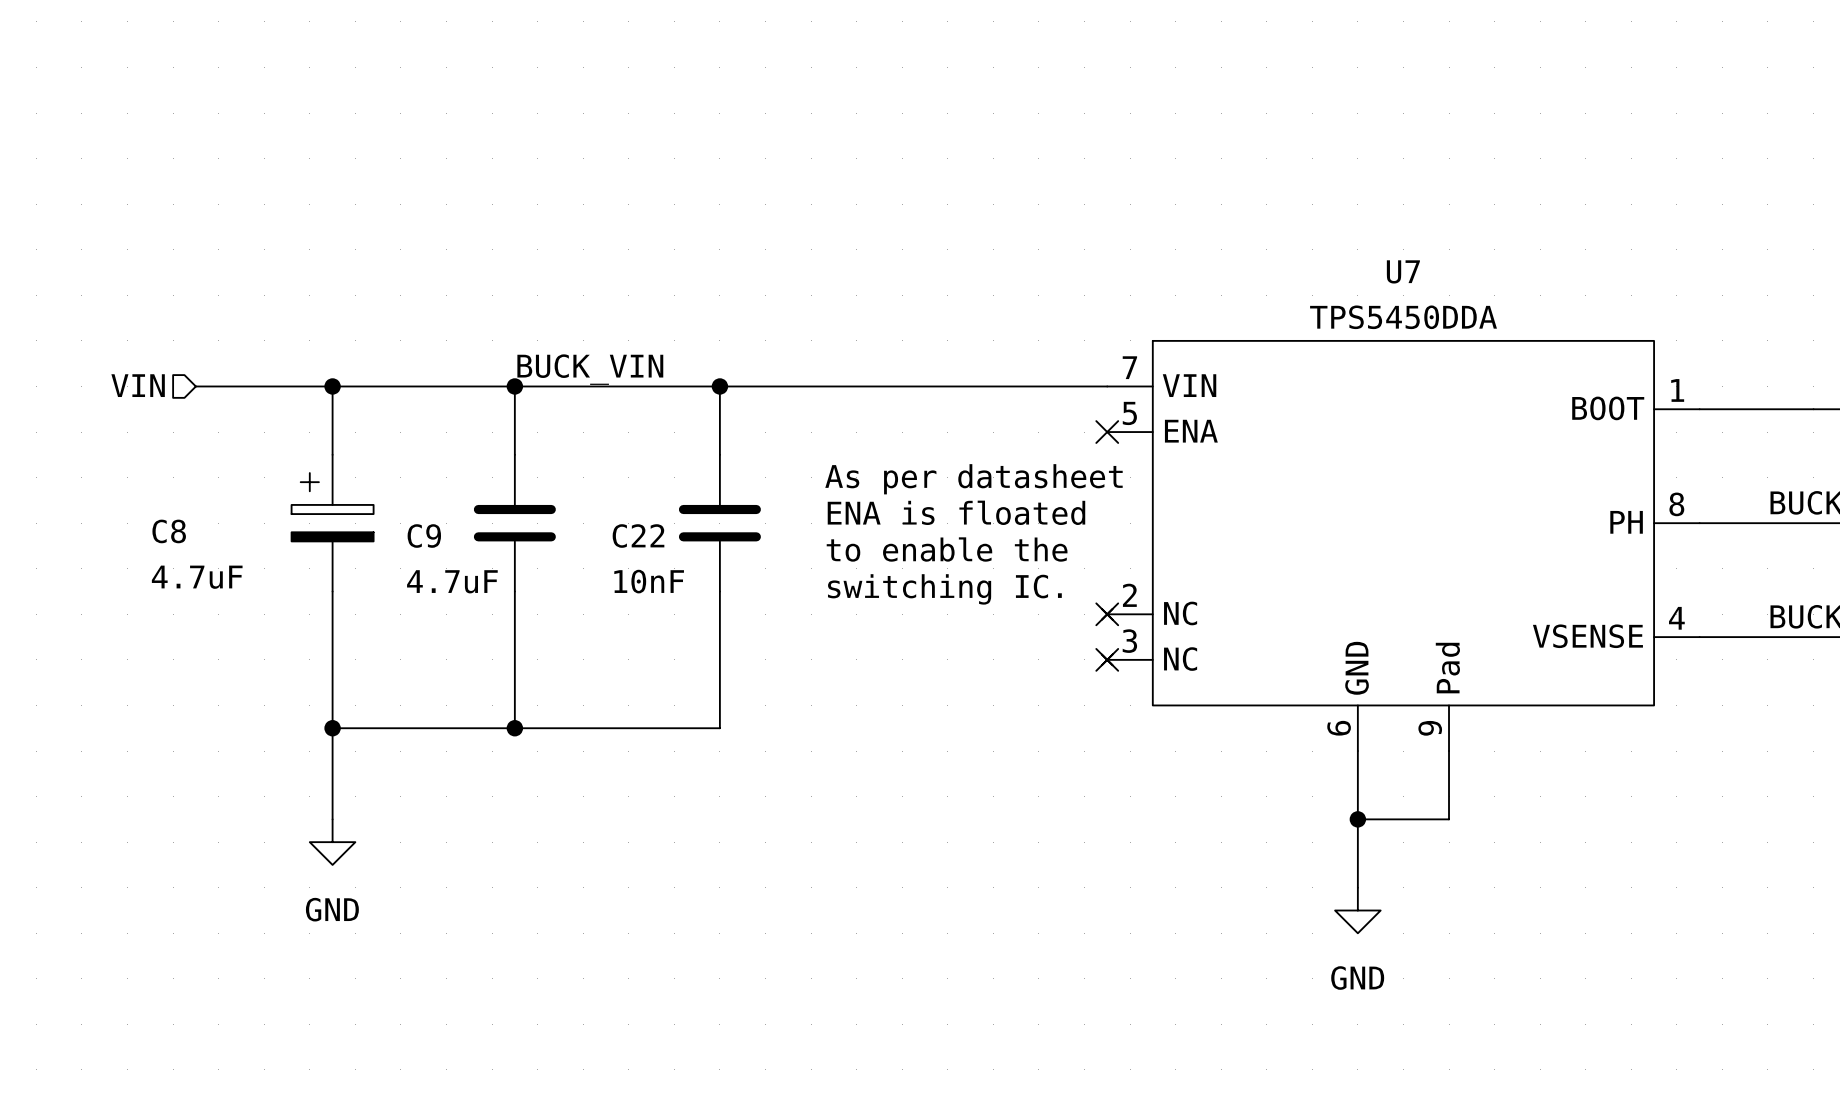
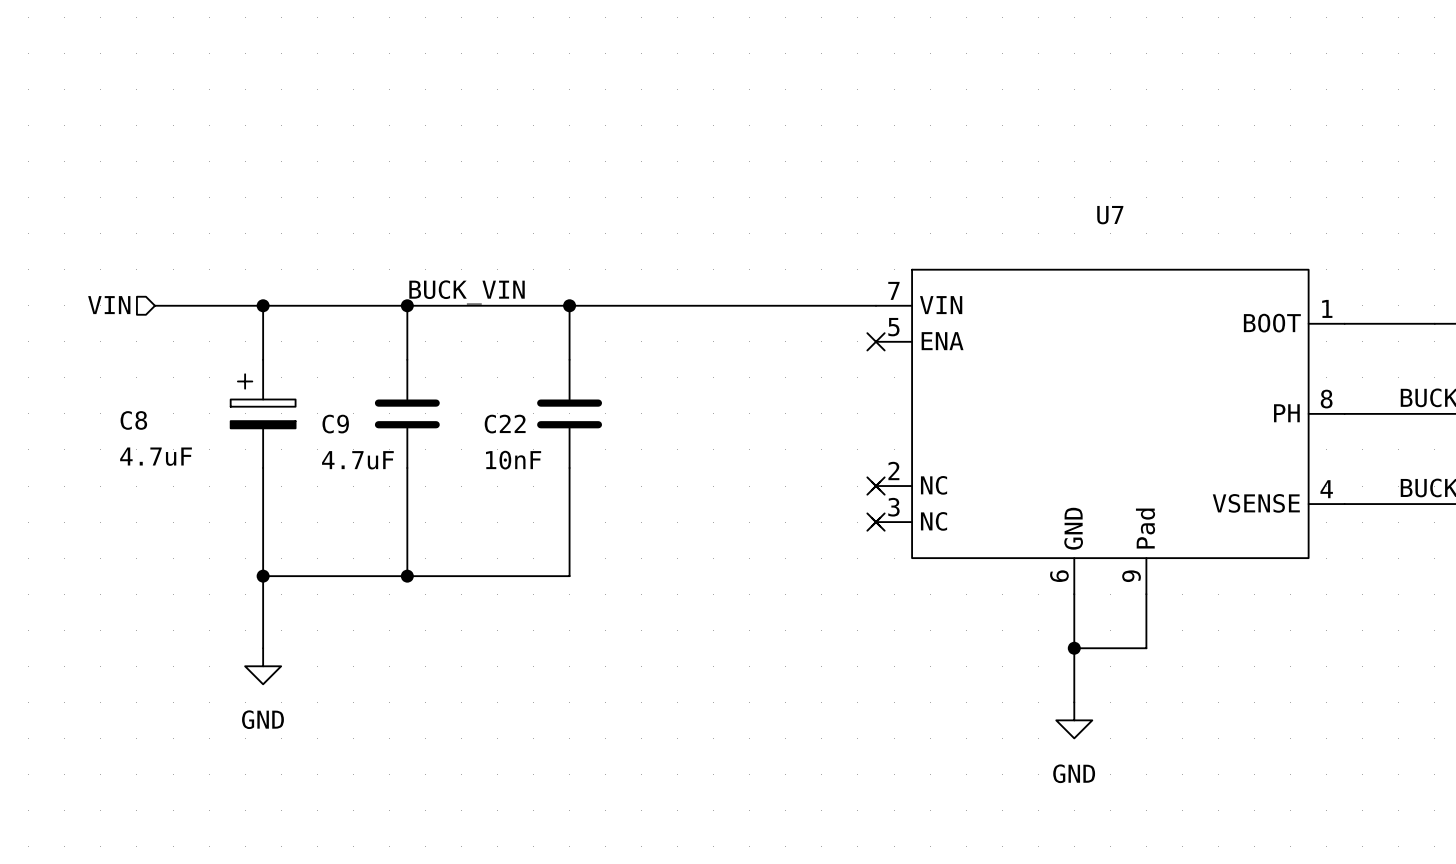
U7 value: TPS5450DDA (1403, 317) -> none
text: As per datasheet (973, 479) -> none
text: ENA is floated (956, 512) -> none
text: to enable the (947, 549) -> none
text: switching IC. (944, 589) -> none

